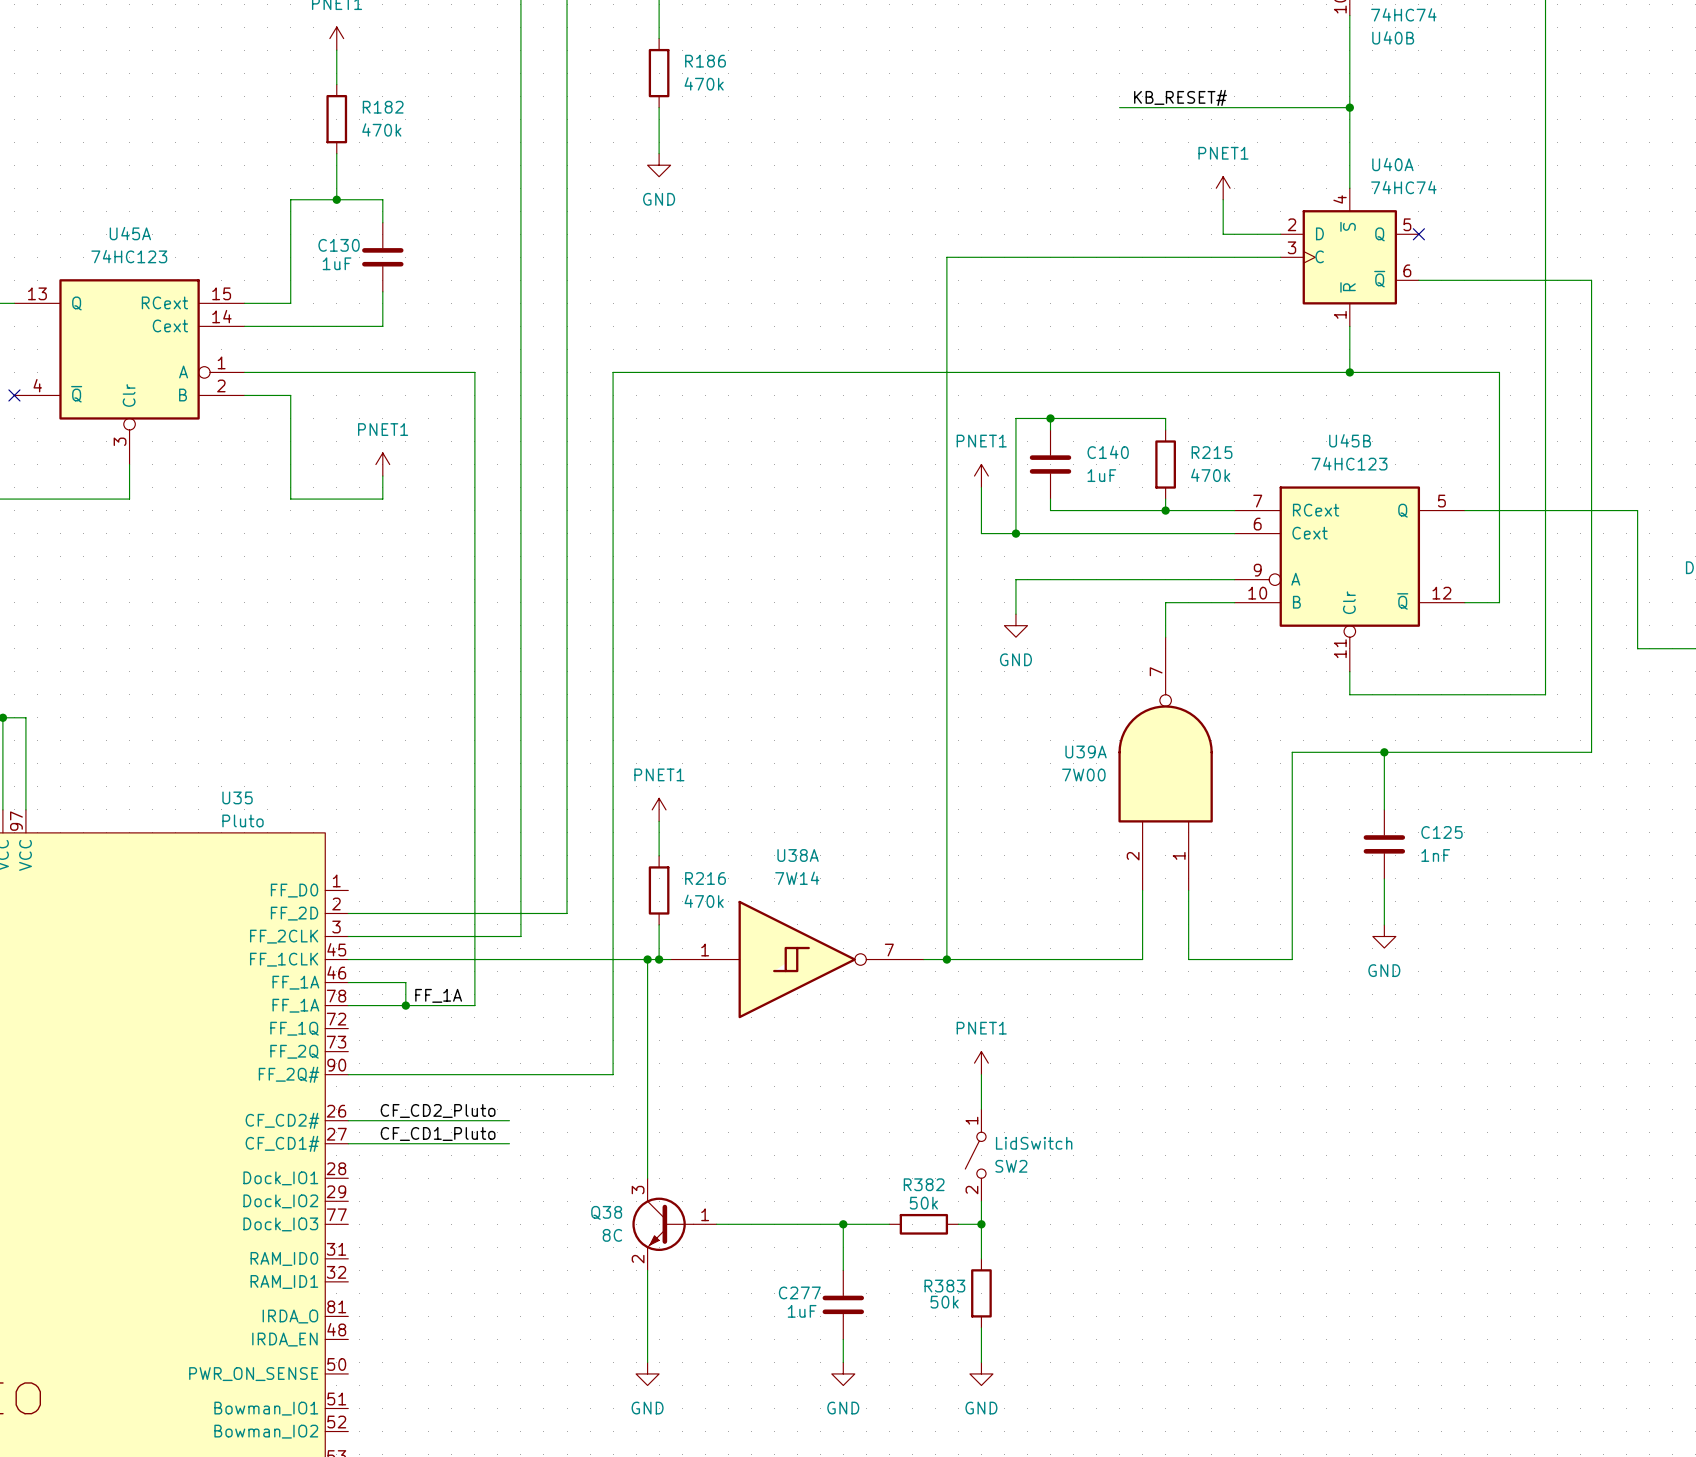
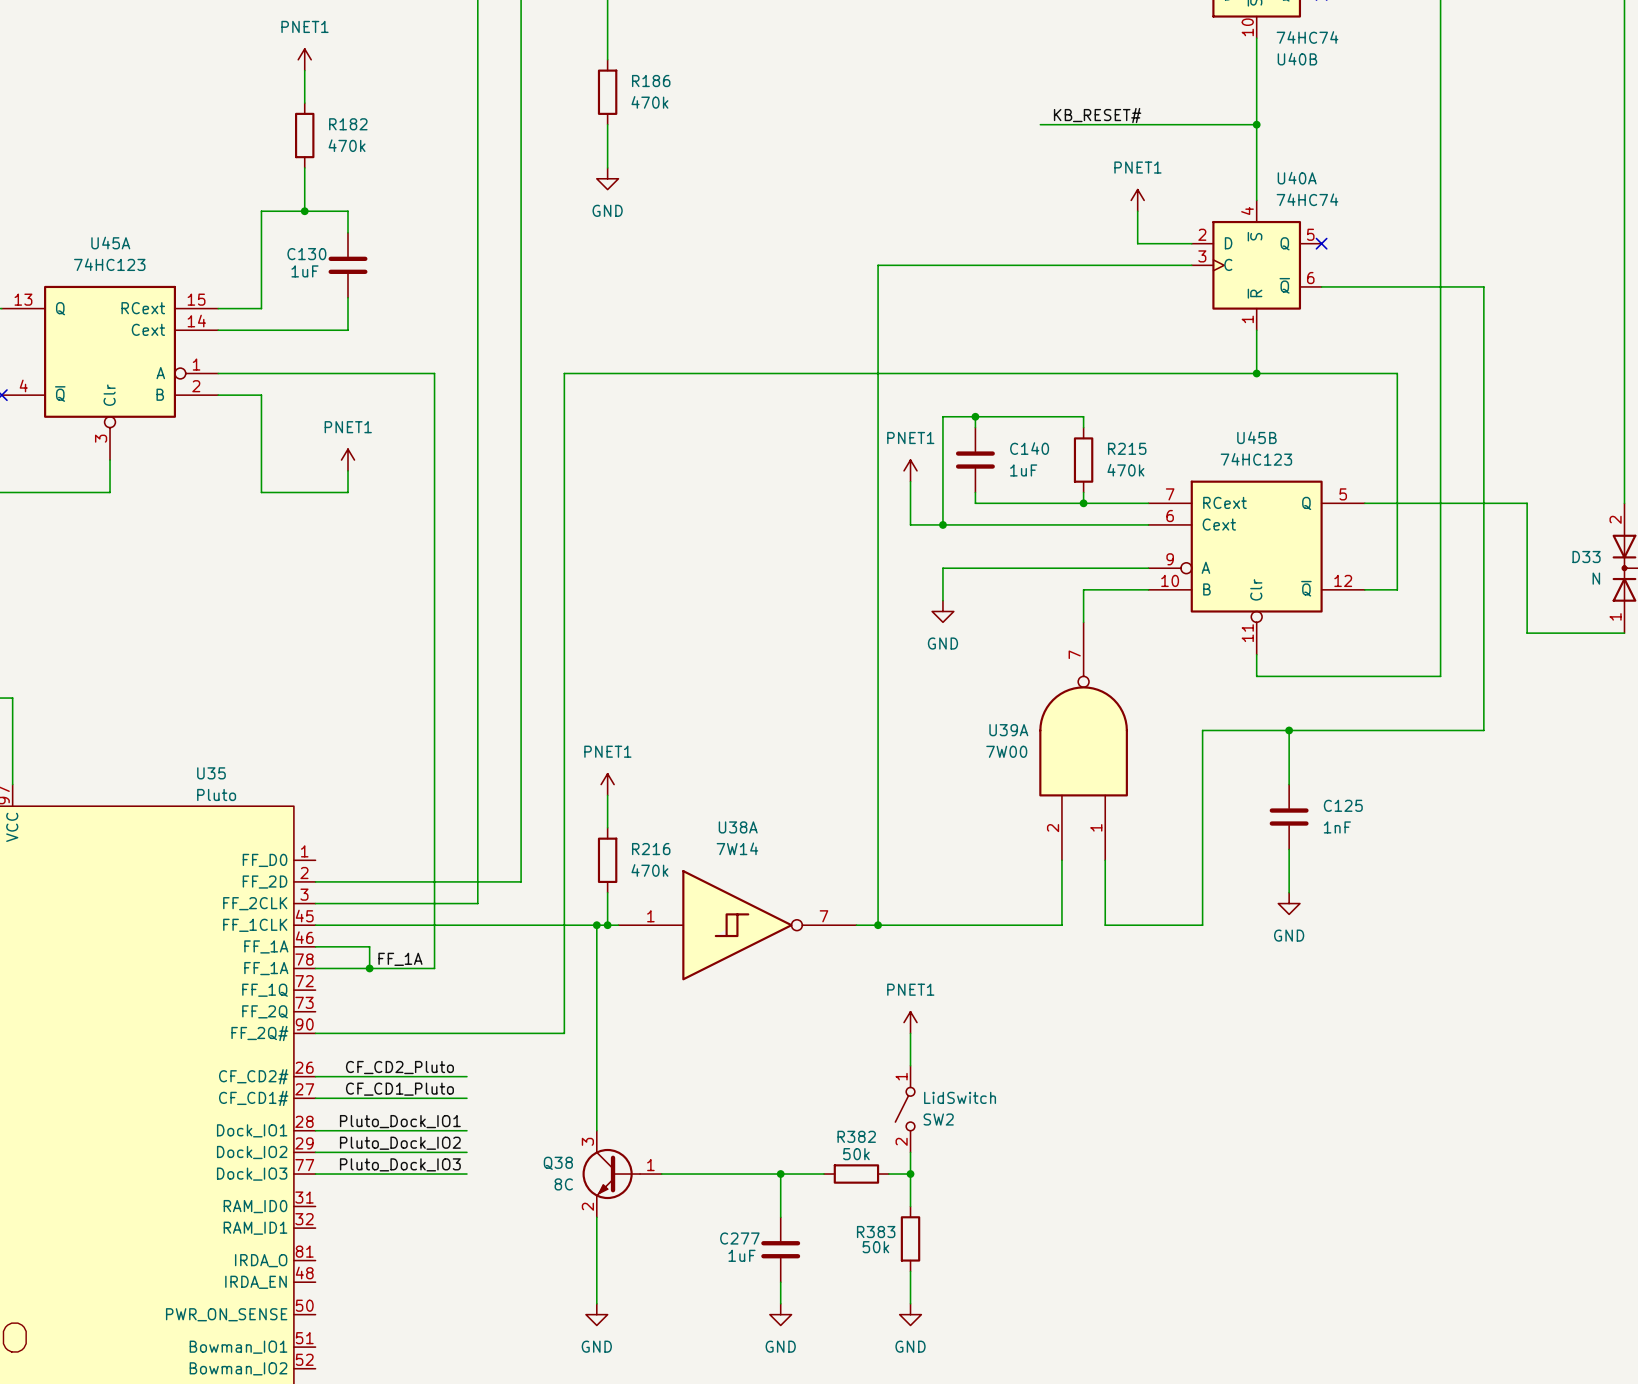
label: none -> Pluto_Dock_IO1 (400, 1121)
wire: none -> (315, 1130) (466, 1130)
label: none -> Pluto_Dock_IO2 (400, 1143)
wire: none -> (315, 1152) (466, 1152)
label: none -> Pluto_Dock_IO3 (400, 1164)
wire: none -> (315, 1174) (466, 1174)

